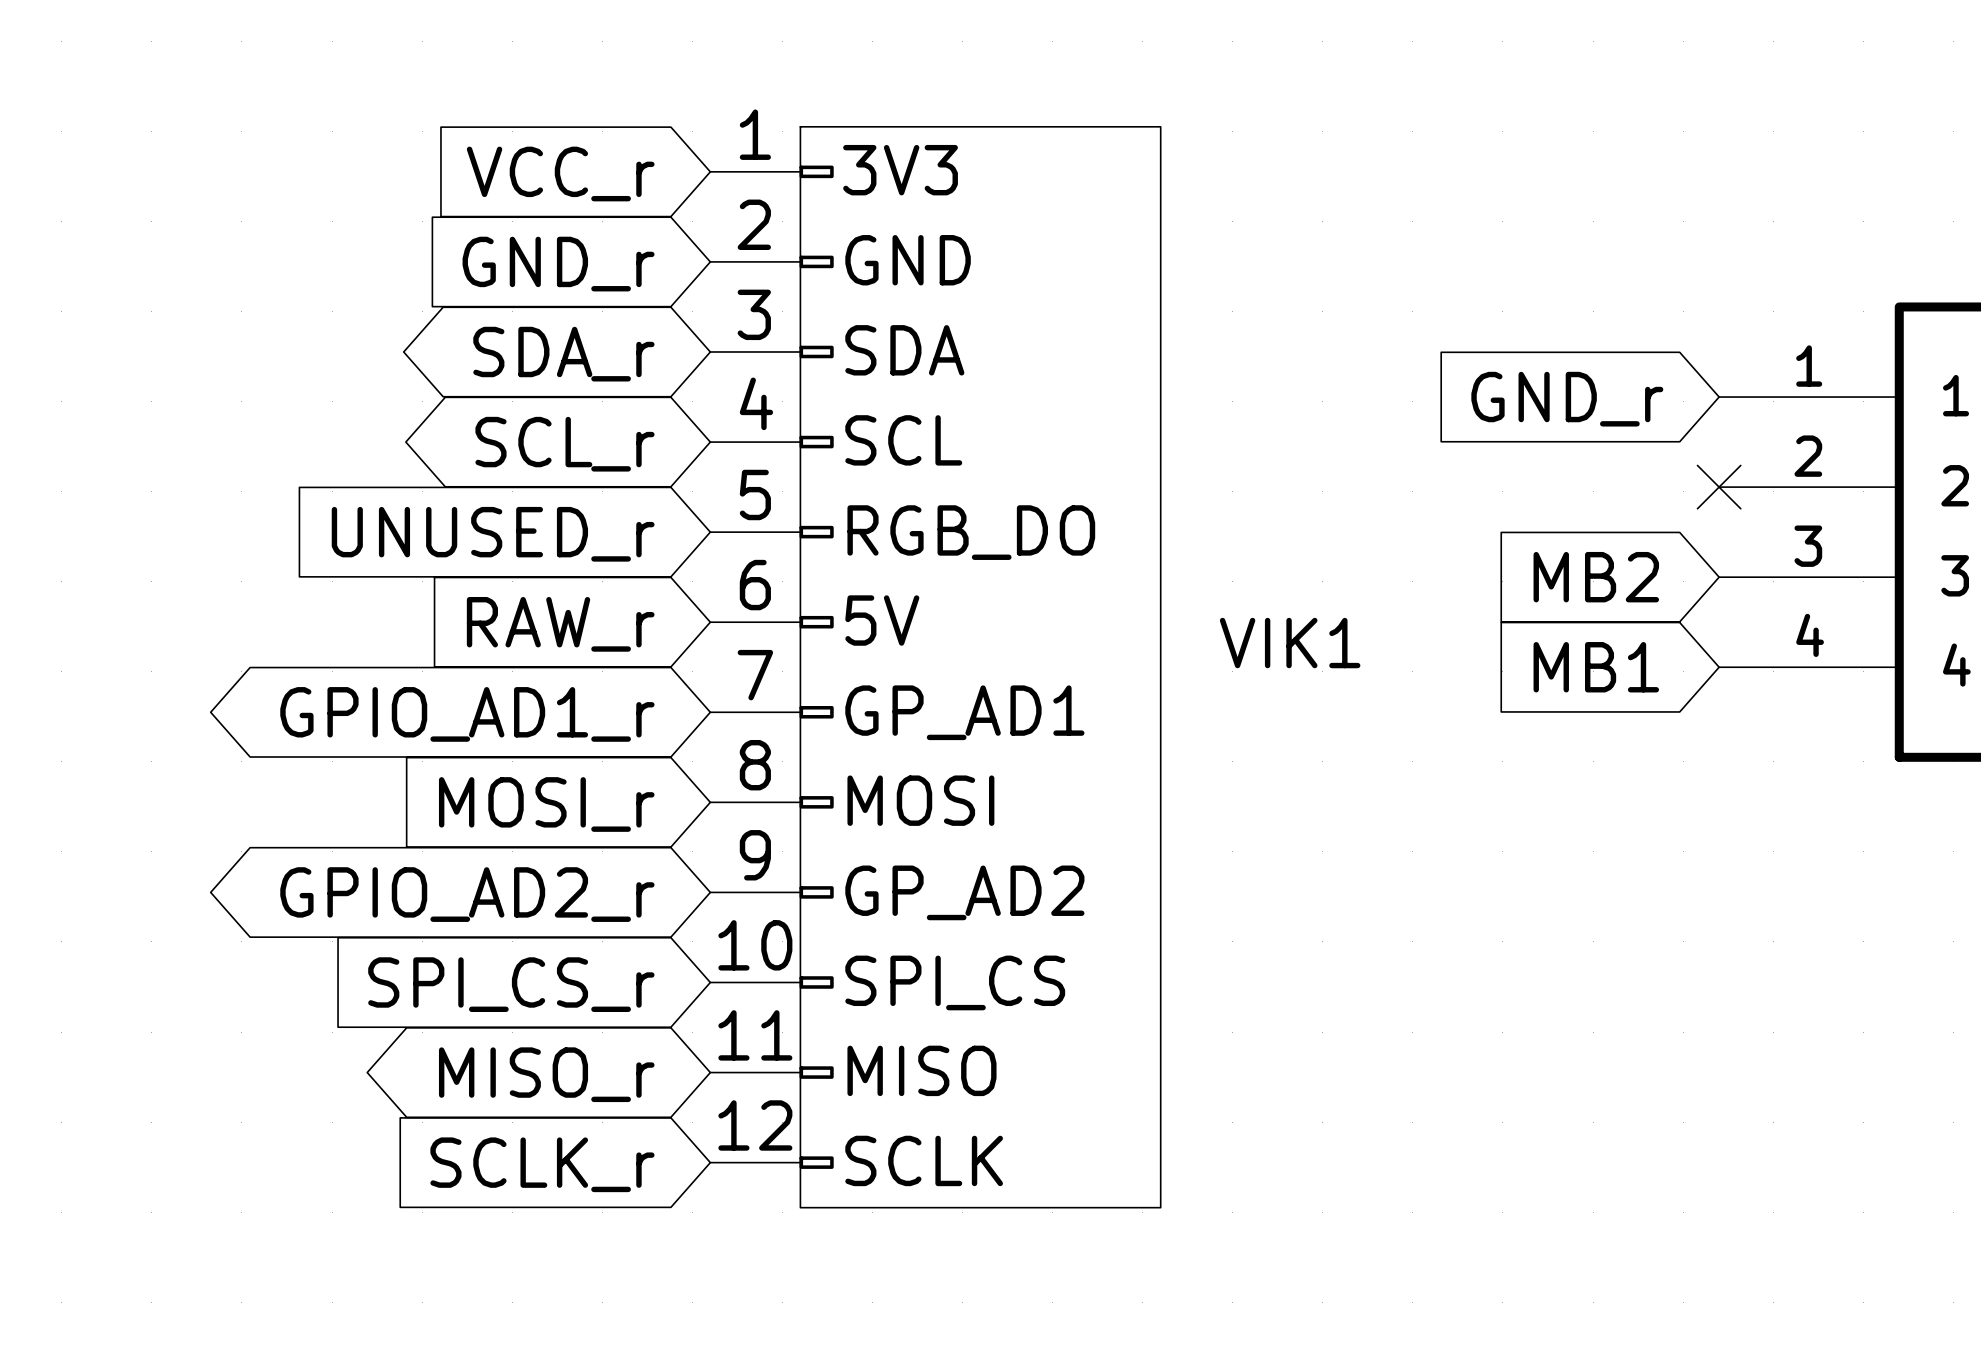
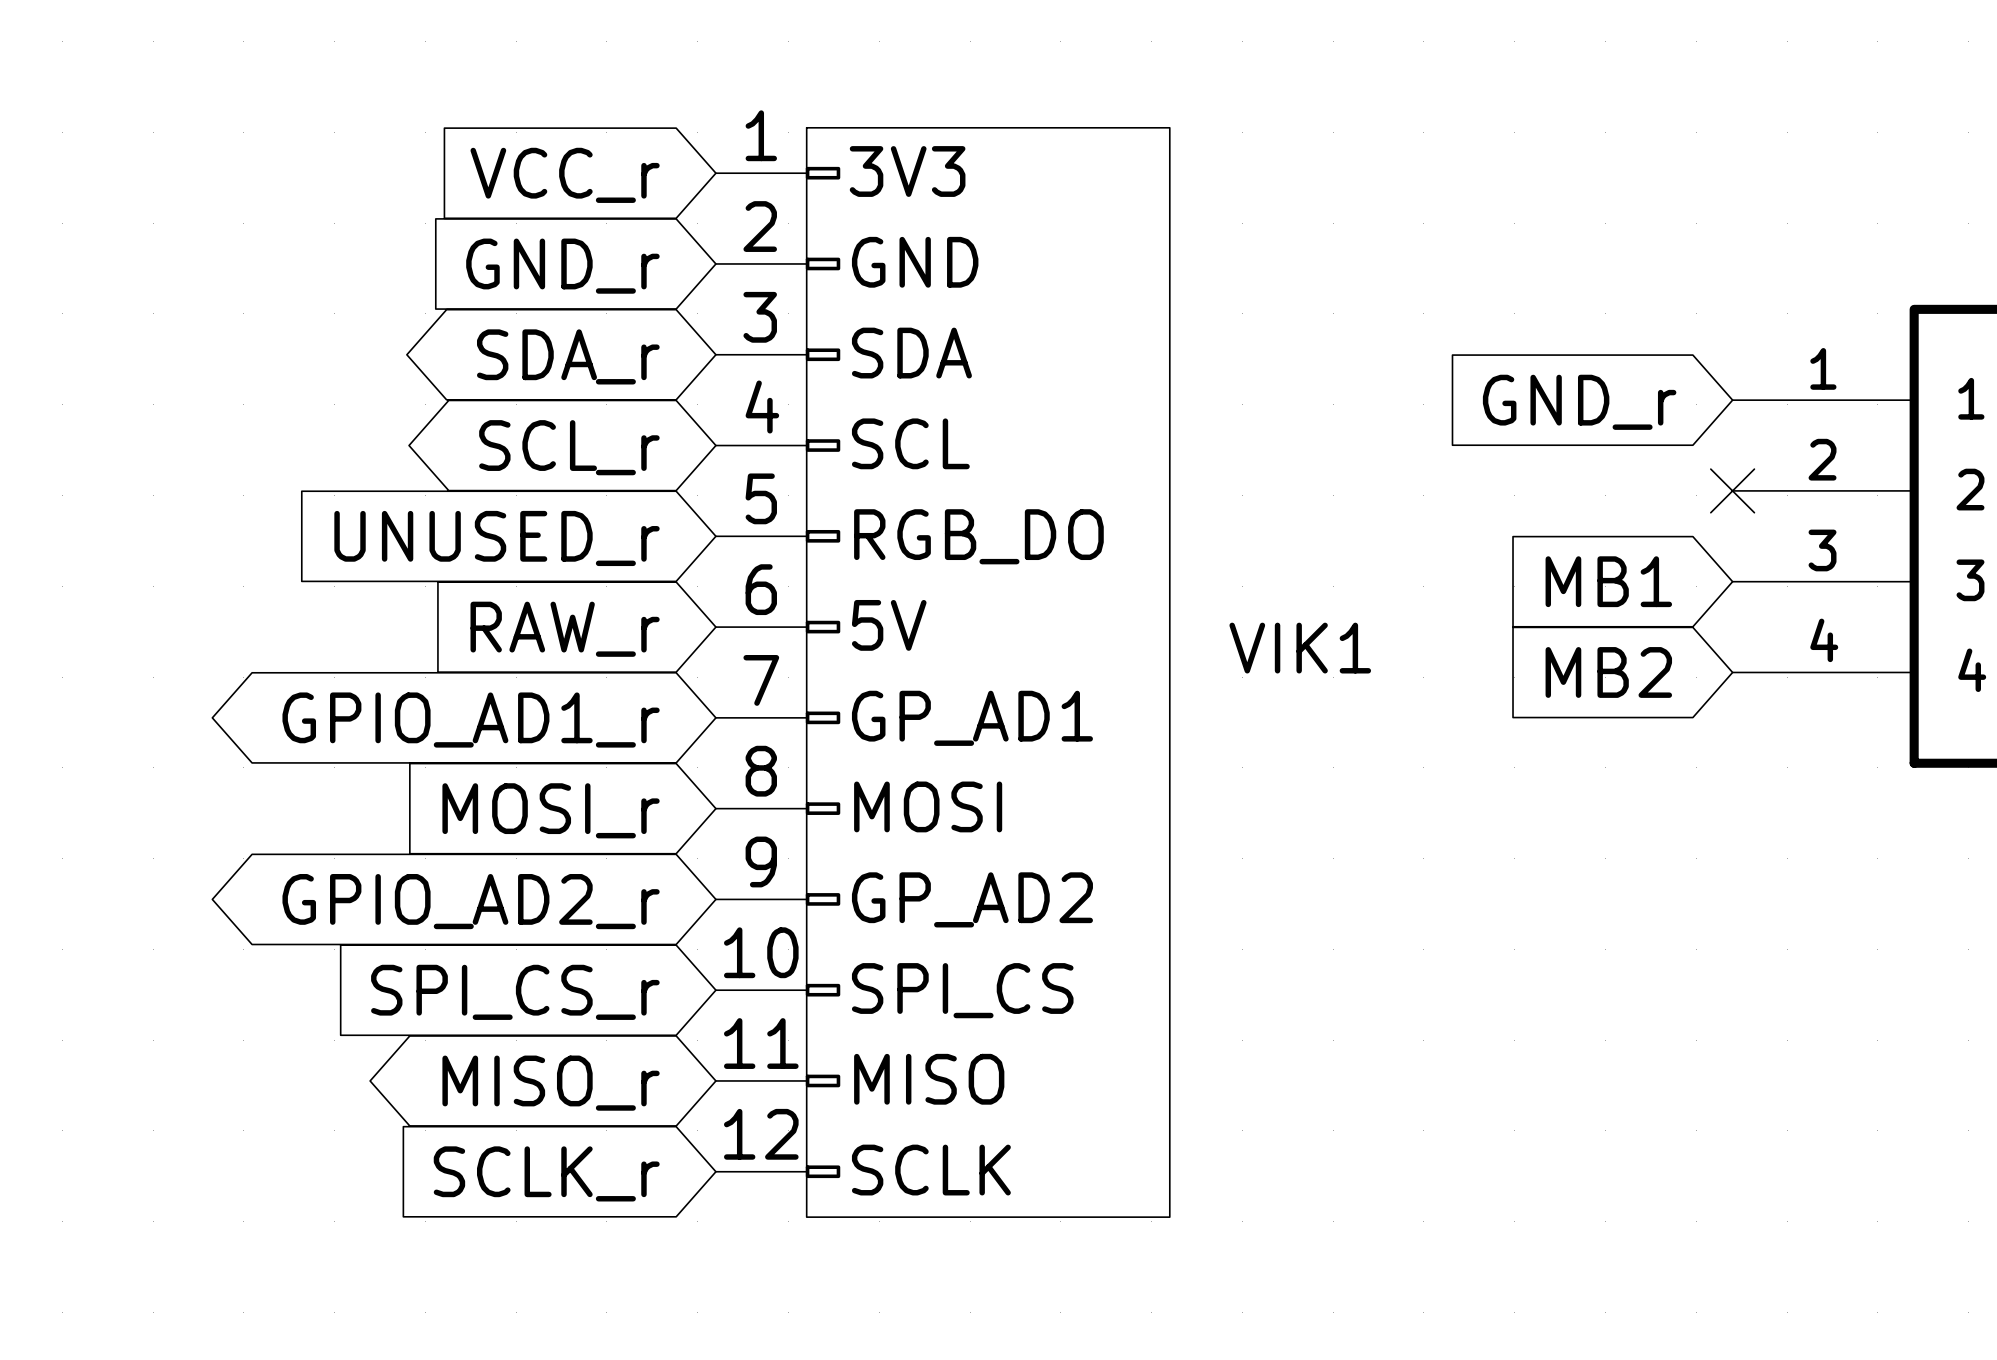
global label: MB2 (1596, 577) -> MB1 (1608, 581)
global label: MB1 (1596, 667) -> MB2 (1608, 672)

